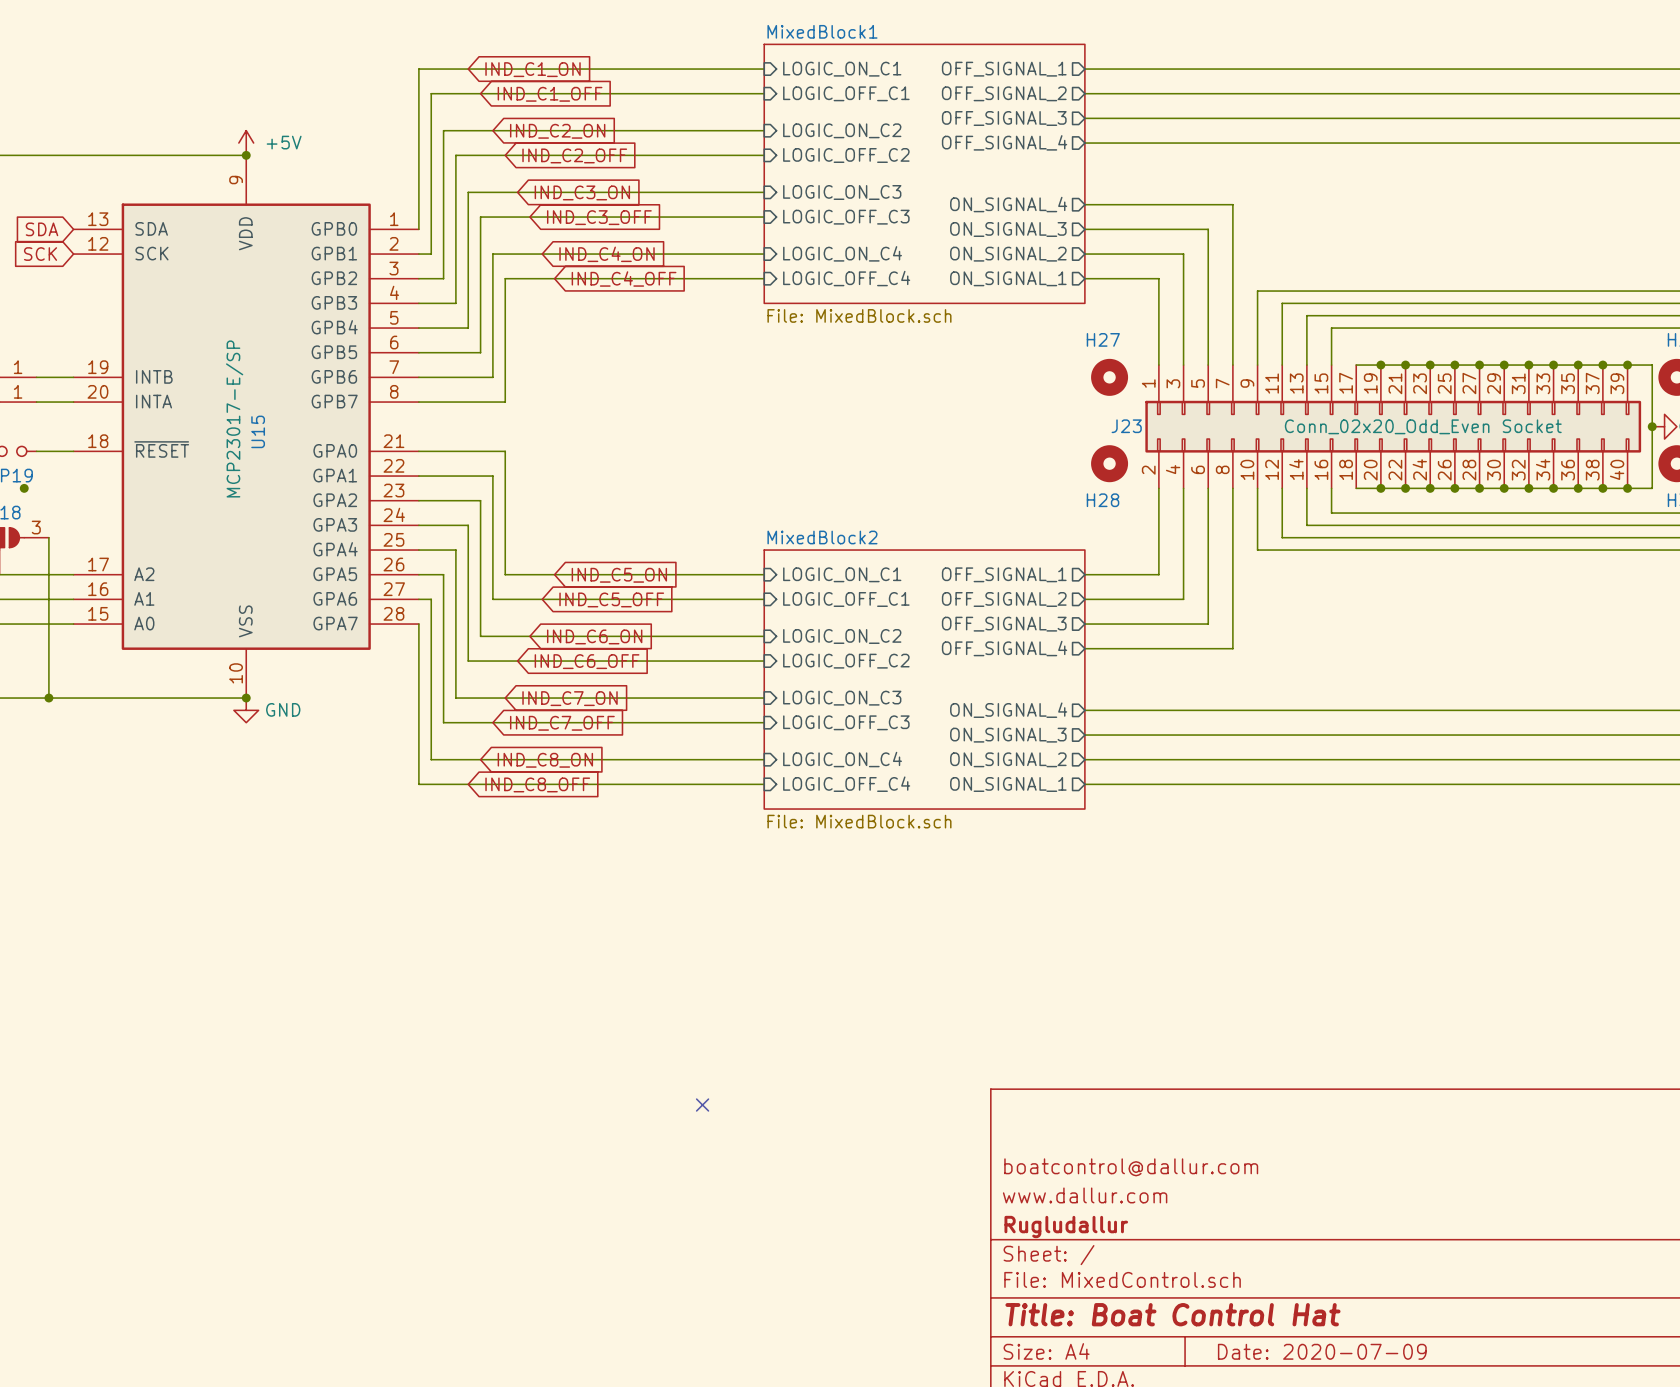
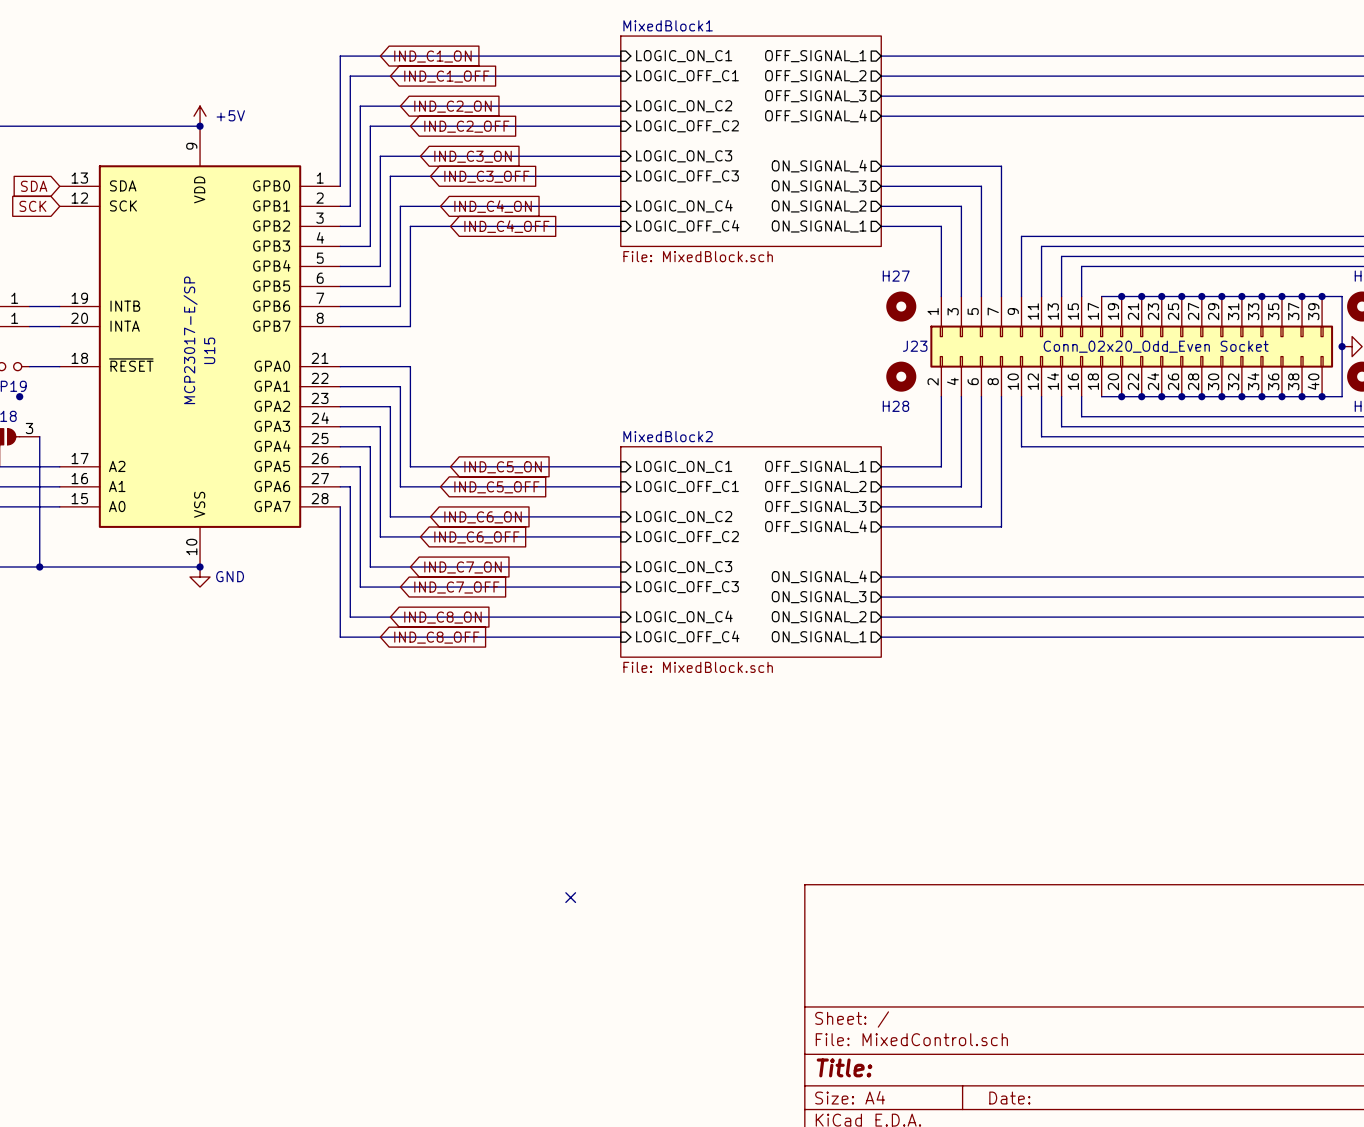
title block: boatcontrol@dallur.com (1131, 1167) -> none
title block: www.dallur.com (1085, 1195) -> none
title block: Rugludallur (1066, 1227) -> none
title block: Title: Boat Control Hat (1172, 1314) -> Title: (844, 1067)
title block: Date: 2020-07-09 (1322, 1351) -> Date: (1009, 1098)

